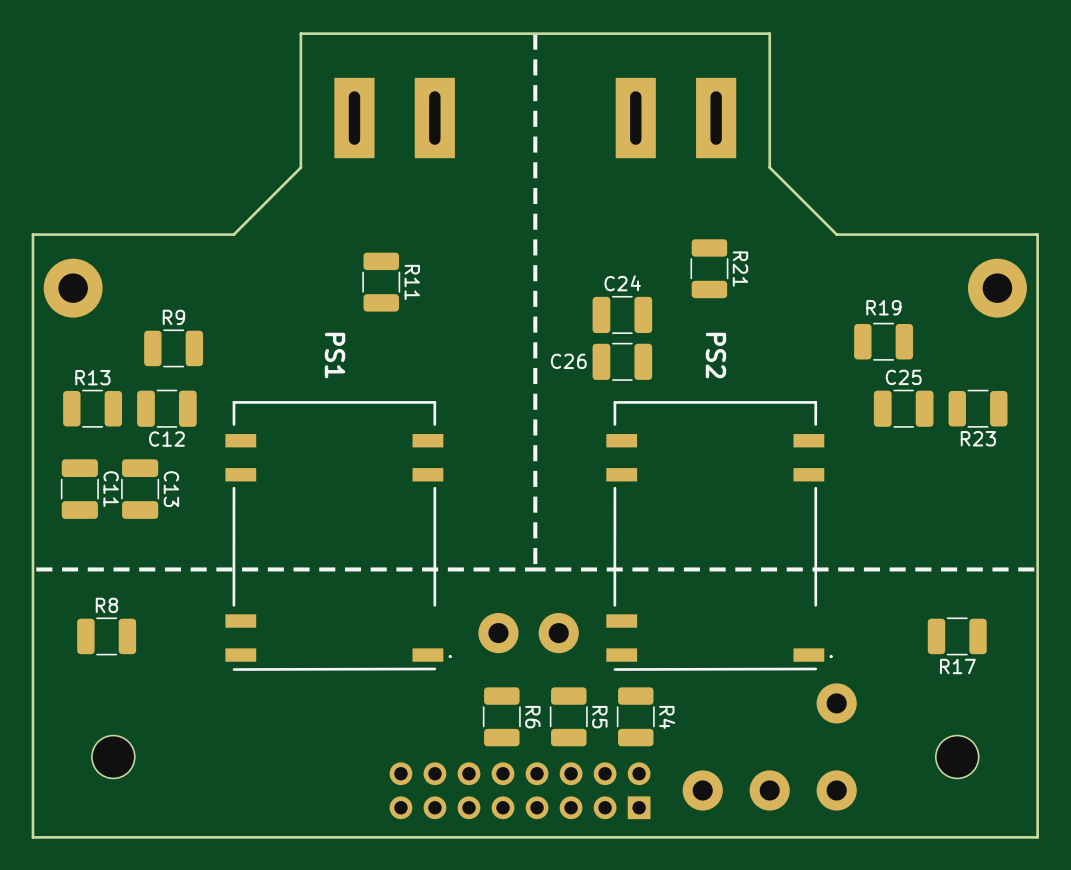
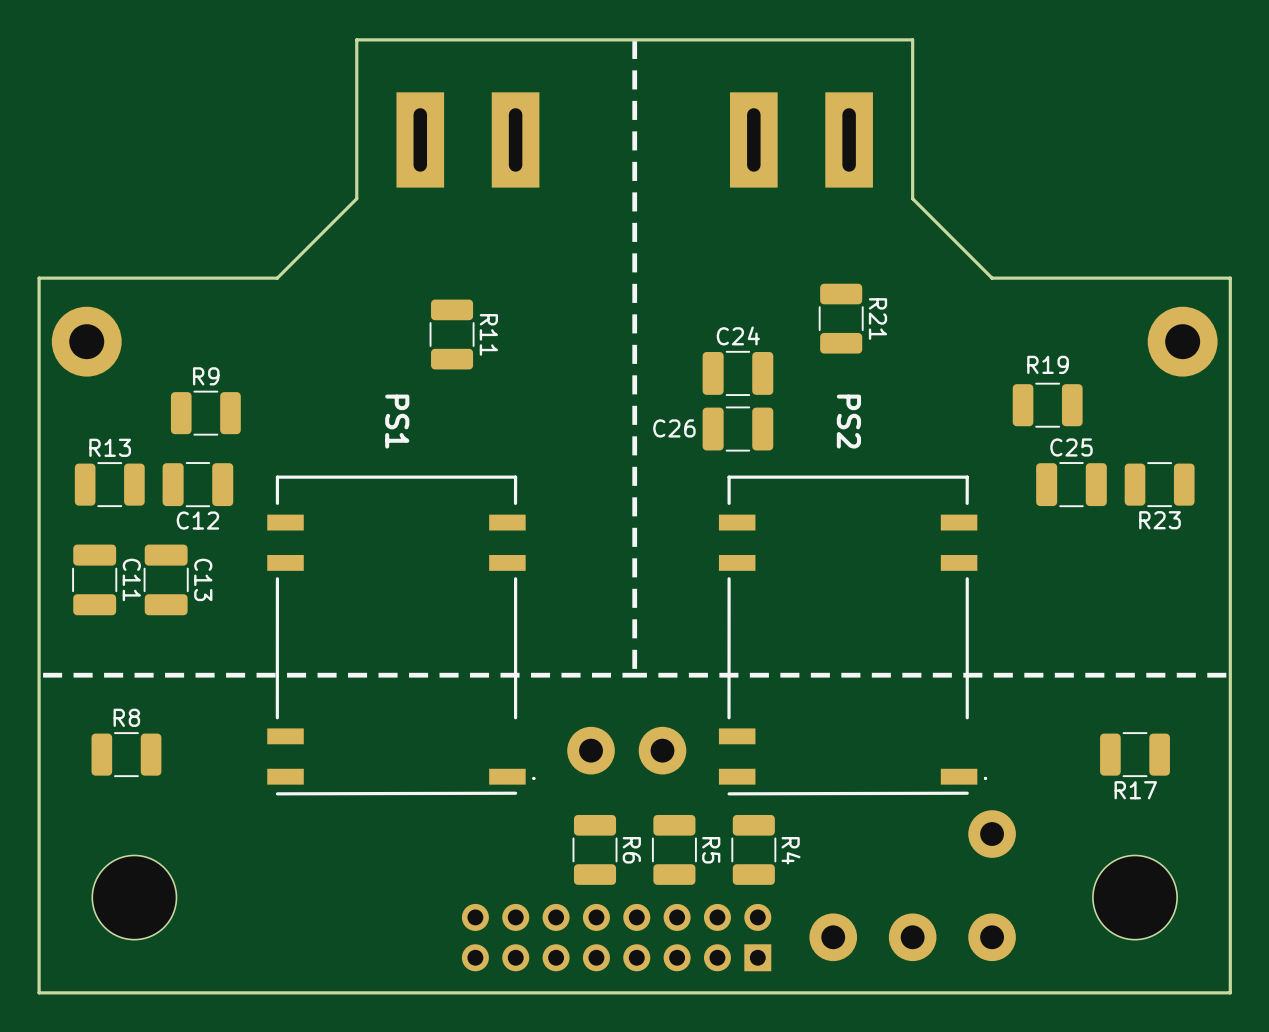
part footprint: [91, 735, 135, 779] -> [92, 855, 177, 940]
part footprint: [935, 735, 979, 779] -> [1092, 855, 1178, 940]

